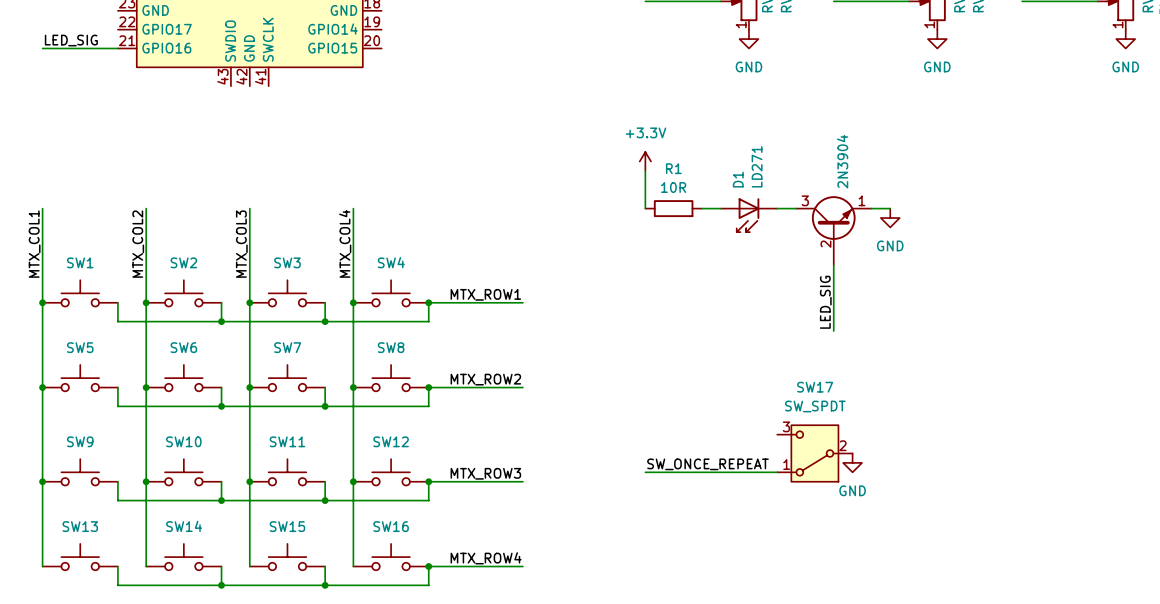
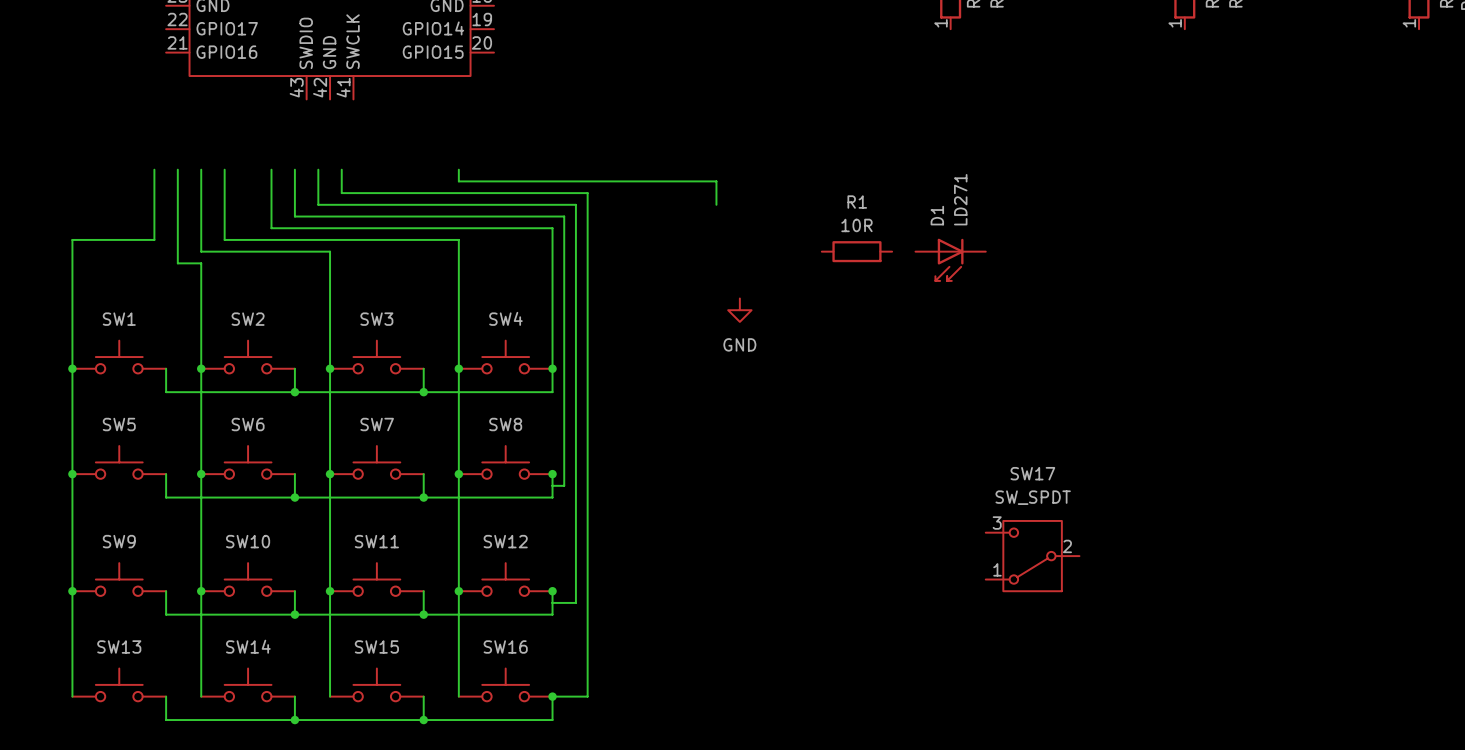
power symbol: GND (748, 39) -> none
power symbol: GND (937, 39) -> none
power symbol: GND (1125, 39) -> none
label: LED_SIG (71, 40) -> none
wire: (42, 48) (117, 48) -> none
wire: none -> (154, 169) (154, 239) (72, 239) (72, 251)
wire: none -> (201, 169) (201, 251) (330, 251)
wire: none -> (224, 169) (224, 239) (458, 239) (458, 251)
wire: none -> (294, 169) (294, 216) (564, 216) (564, 485) (552, 485)
wire: none -> (318, 169) (318, 204) (575, 204) (575, 602) (552, 602)
wire: none -> (458, 169) (458, 181) (716, 181) (716, 204)
power symbol: +3.3V (645, 161) -> none
wire: (645, 170) (645, 208) -> none
wire: (146, 208) (146, 218) -> (177, 169) (177, 263) (201, 263)
wire: (701, 208) (720, 208) -> none
wire: (777, 208) (796, 208) -> none
wire: (871, 208) (890, 208) -> none
power symbol: GND (890, 218) -> none
part: 2N3904 (833, 230) -> none
label: MTX_COL4 (345, 243) -> none
label: MTX_COL1 (34, 244) -> none
label: MTX_COL2 (138, 244) -> none
label: MTX_COL3 (241, 244) -> none
power symbol: none -> GND (739, 310)
wire: (833, 265) (833, 331) -> none
label: MTX_ROW1 (485, 294) -> none
wire: (428, 302) (522, 302) -> (552, 368) (552, 228) (271, 228) (271, 169)
label: LED_SIG (825, 302) -> none
label: MTX_ROW2 (485, 379) -> none
wire: (428, 387) (522, 387) -> none
power symbol: GND (852, 462) -> none
label: SW_ONCE_REPEAT (708, 464) -> none
wire: (645, 472) (777, 472) -> none
label: MTX_ROW3 (485, 473) -> none
wire: (428, 481) (522, 481) -> none
label: MTX_ROW4 (486, 558) -> none
wire: (457, 566) (522, 566) -> (587, 696) (587, 193) (341, 193) (341, 169)

